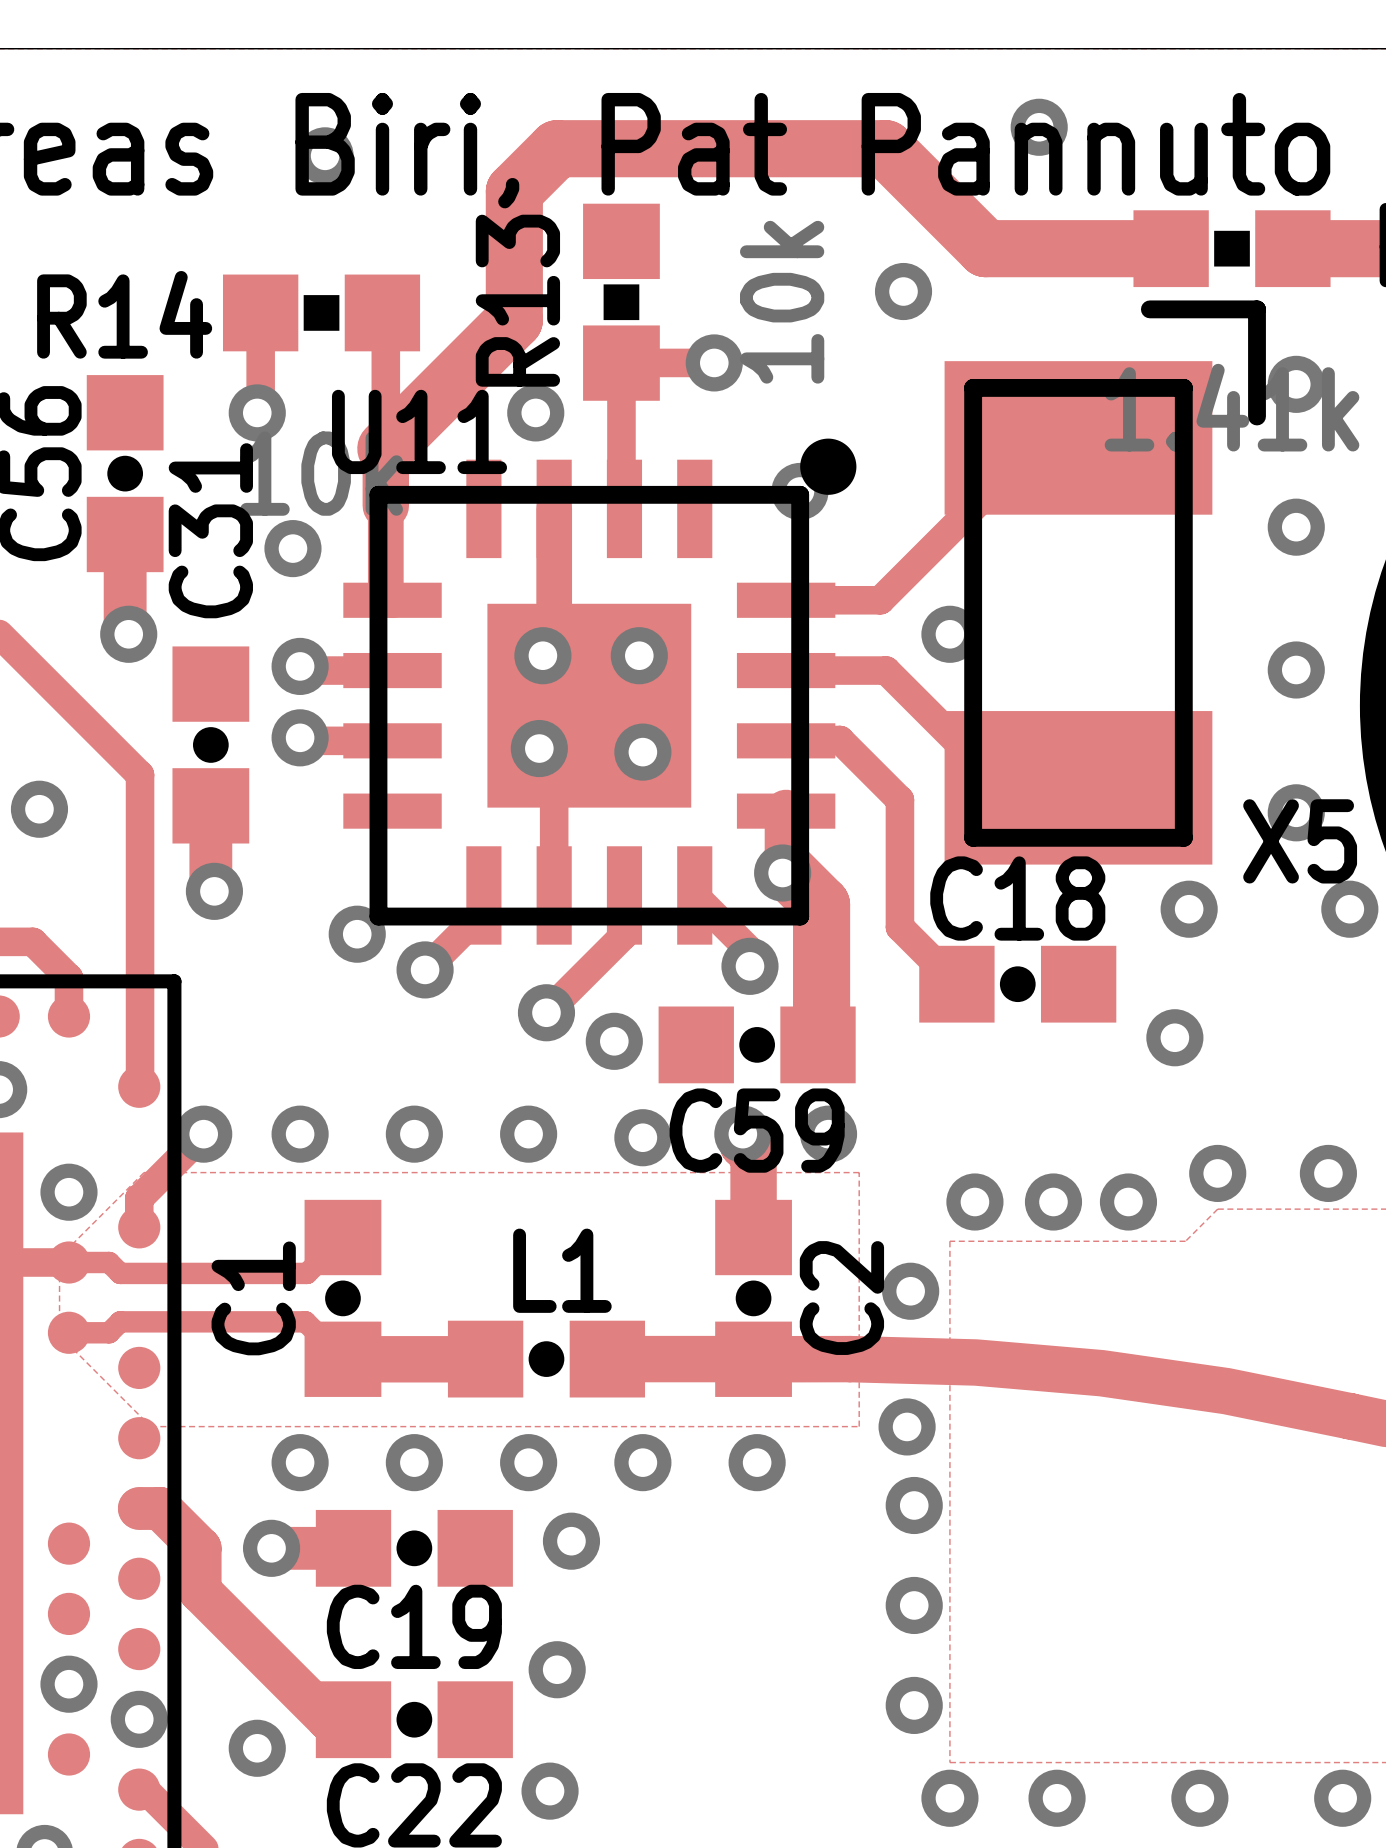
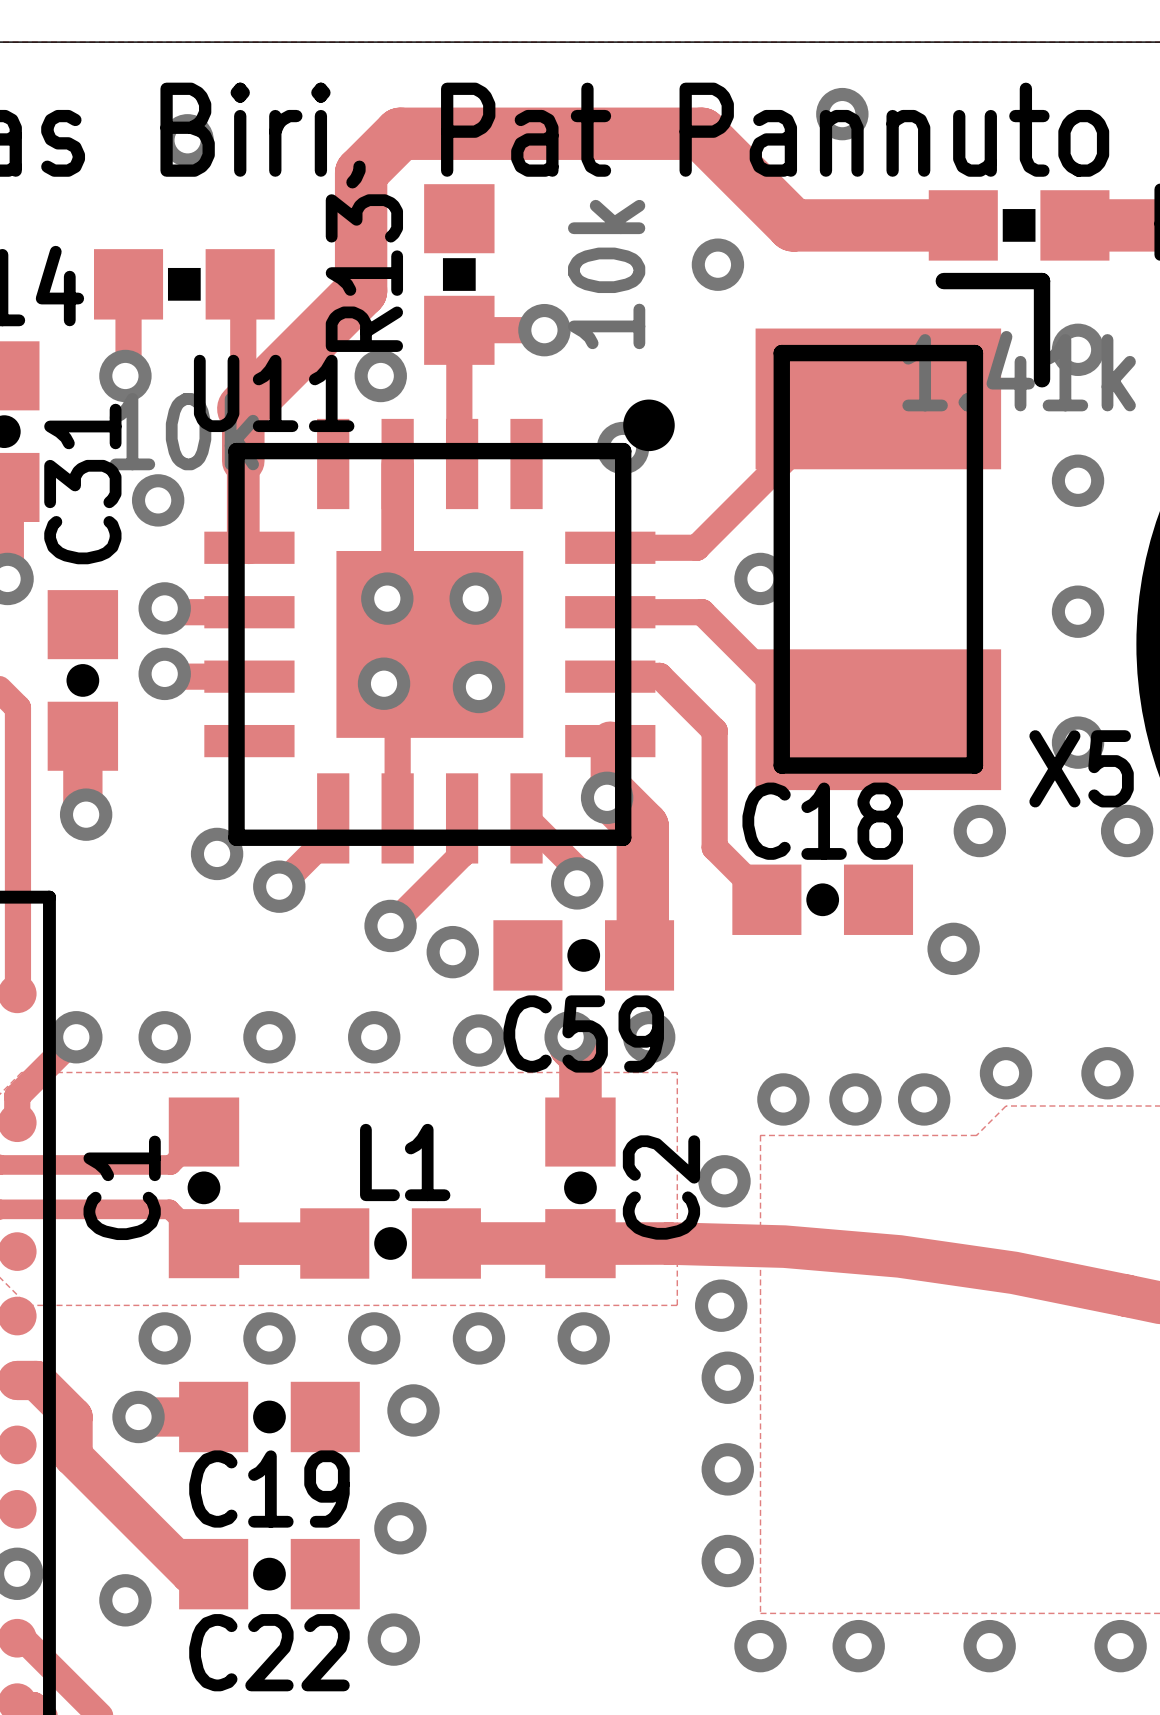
via position: (1174, 1037) -> (953, 948)

